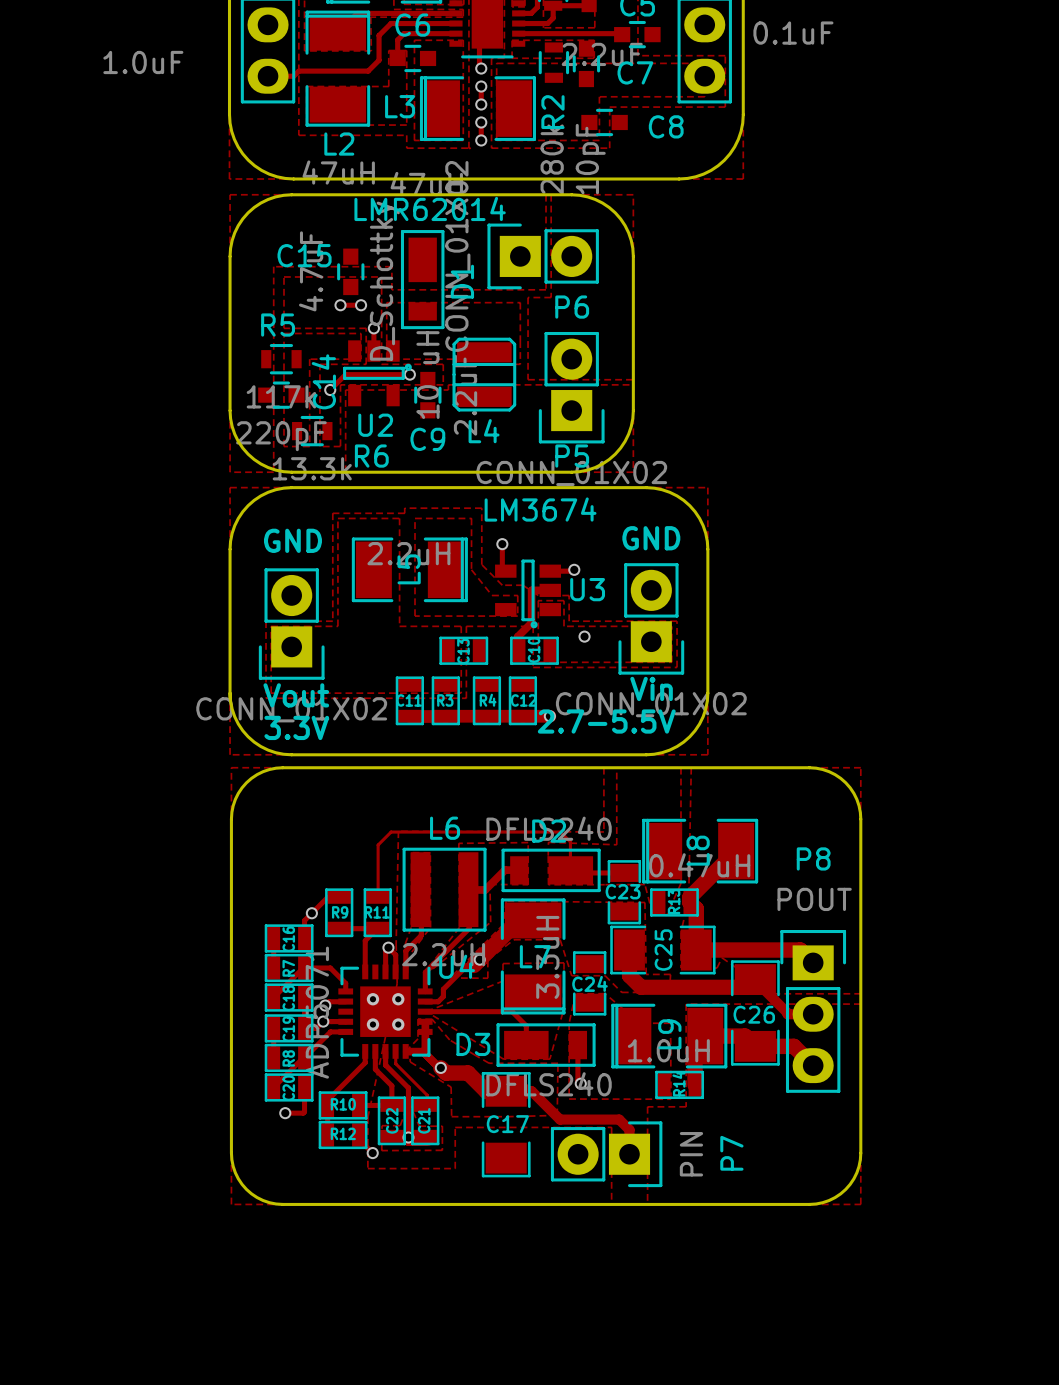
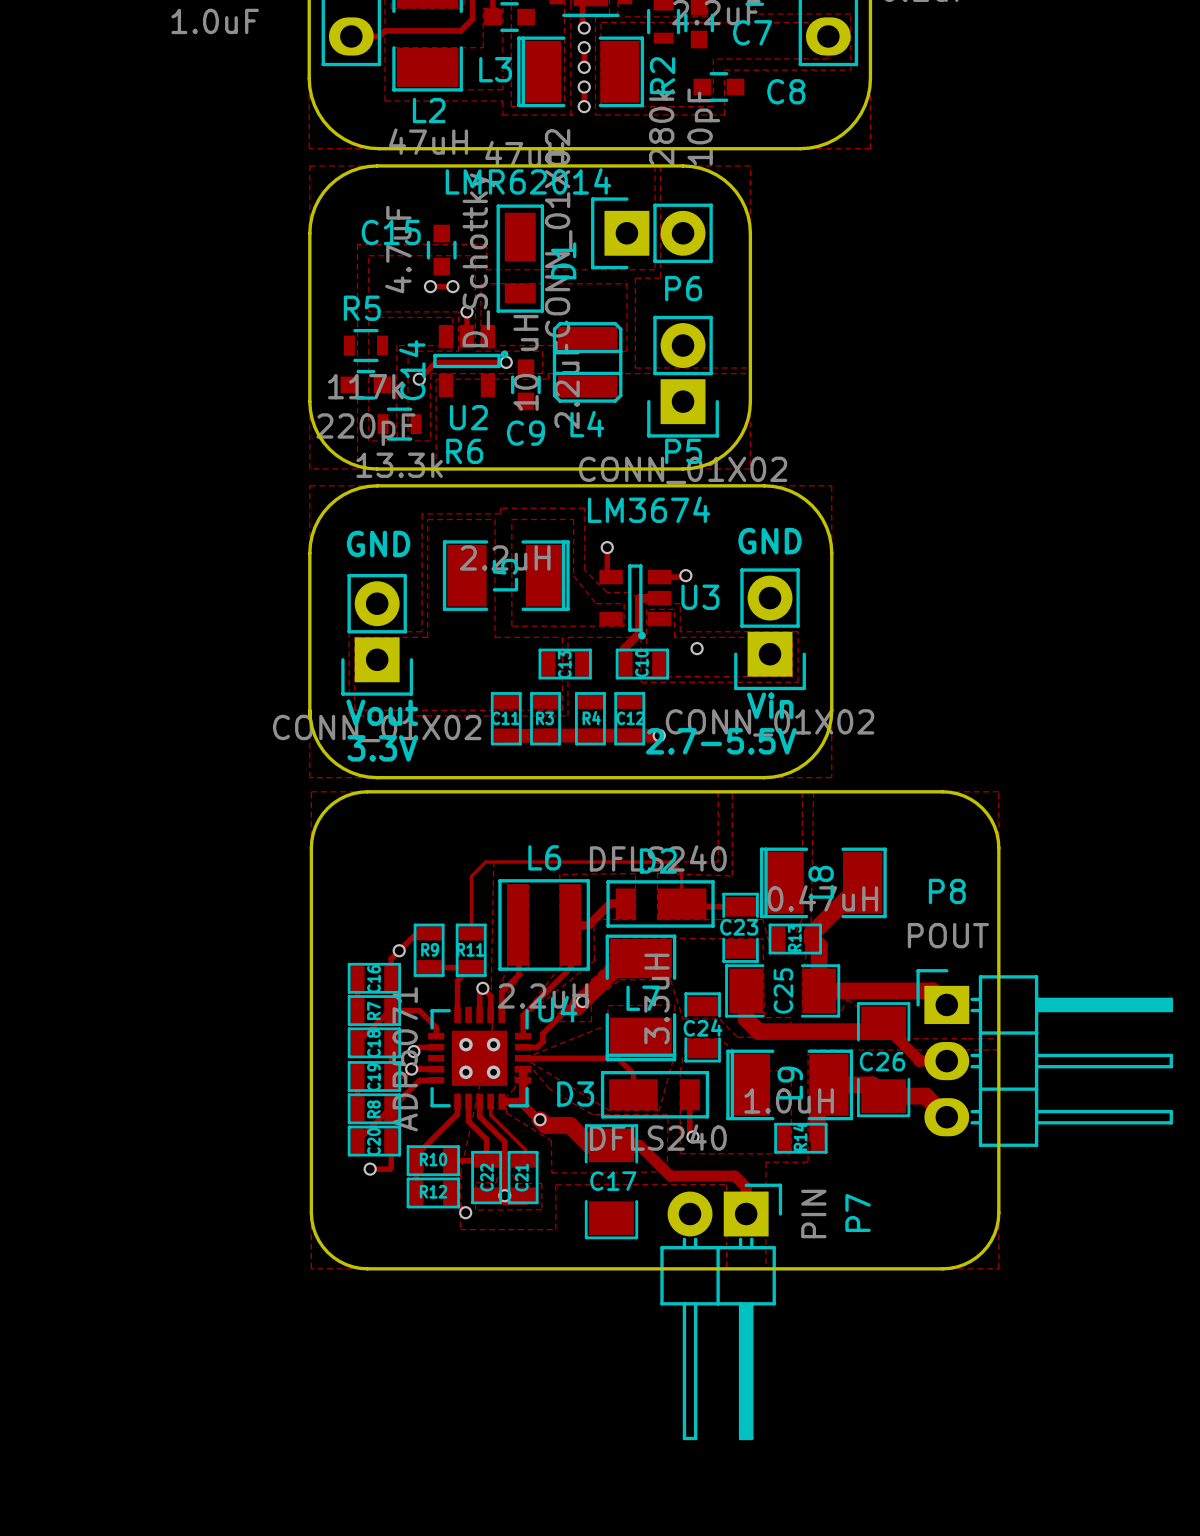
P8 footprint: [780, 930, 847, 1093] -> [916, 969, 1173, 1147]
P7 footprint: [550, 1121, 663, 1188] -> [660, 1183, 783, 1441]

